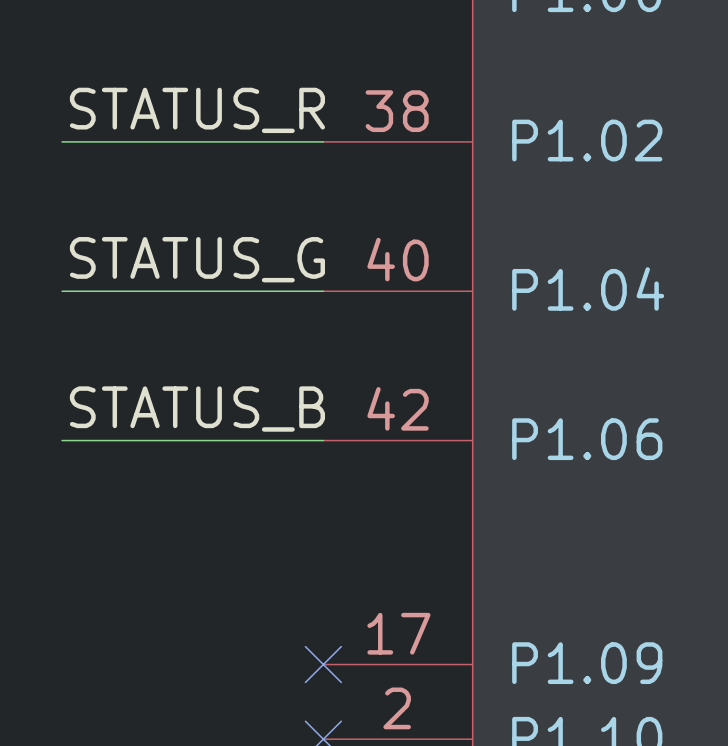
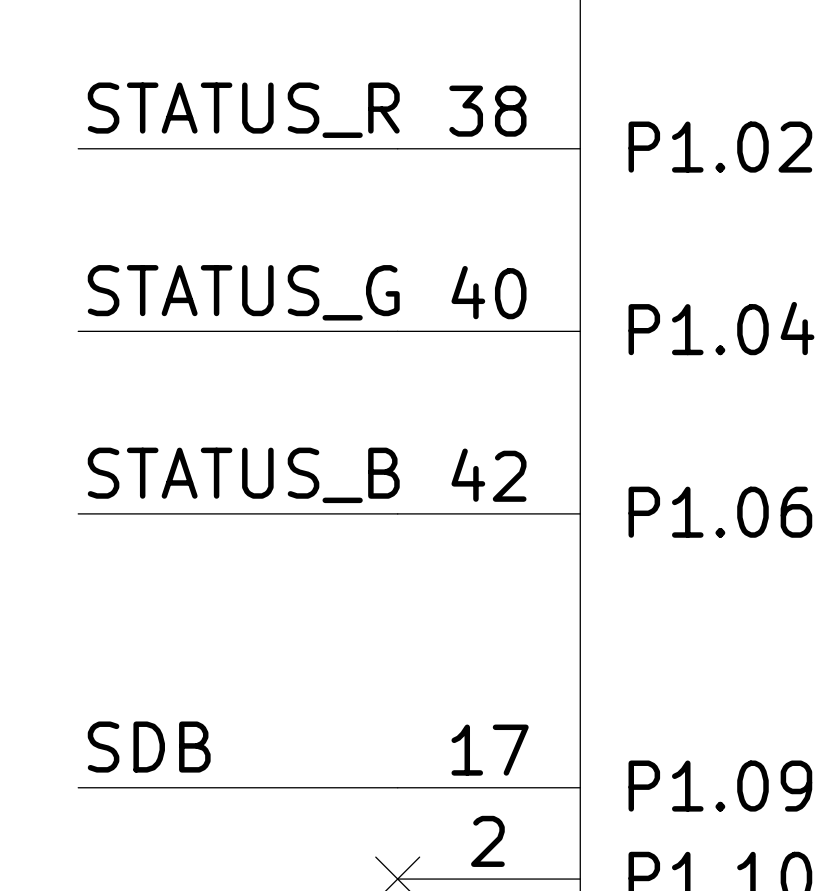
label: none -> SDB (149, 747)
wire: none -> (78, 787) (397, 787)
no-connect mark: (323, 664) -> none

